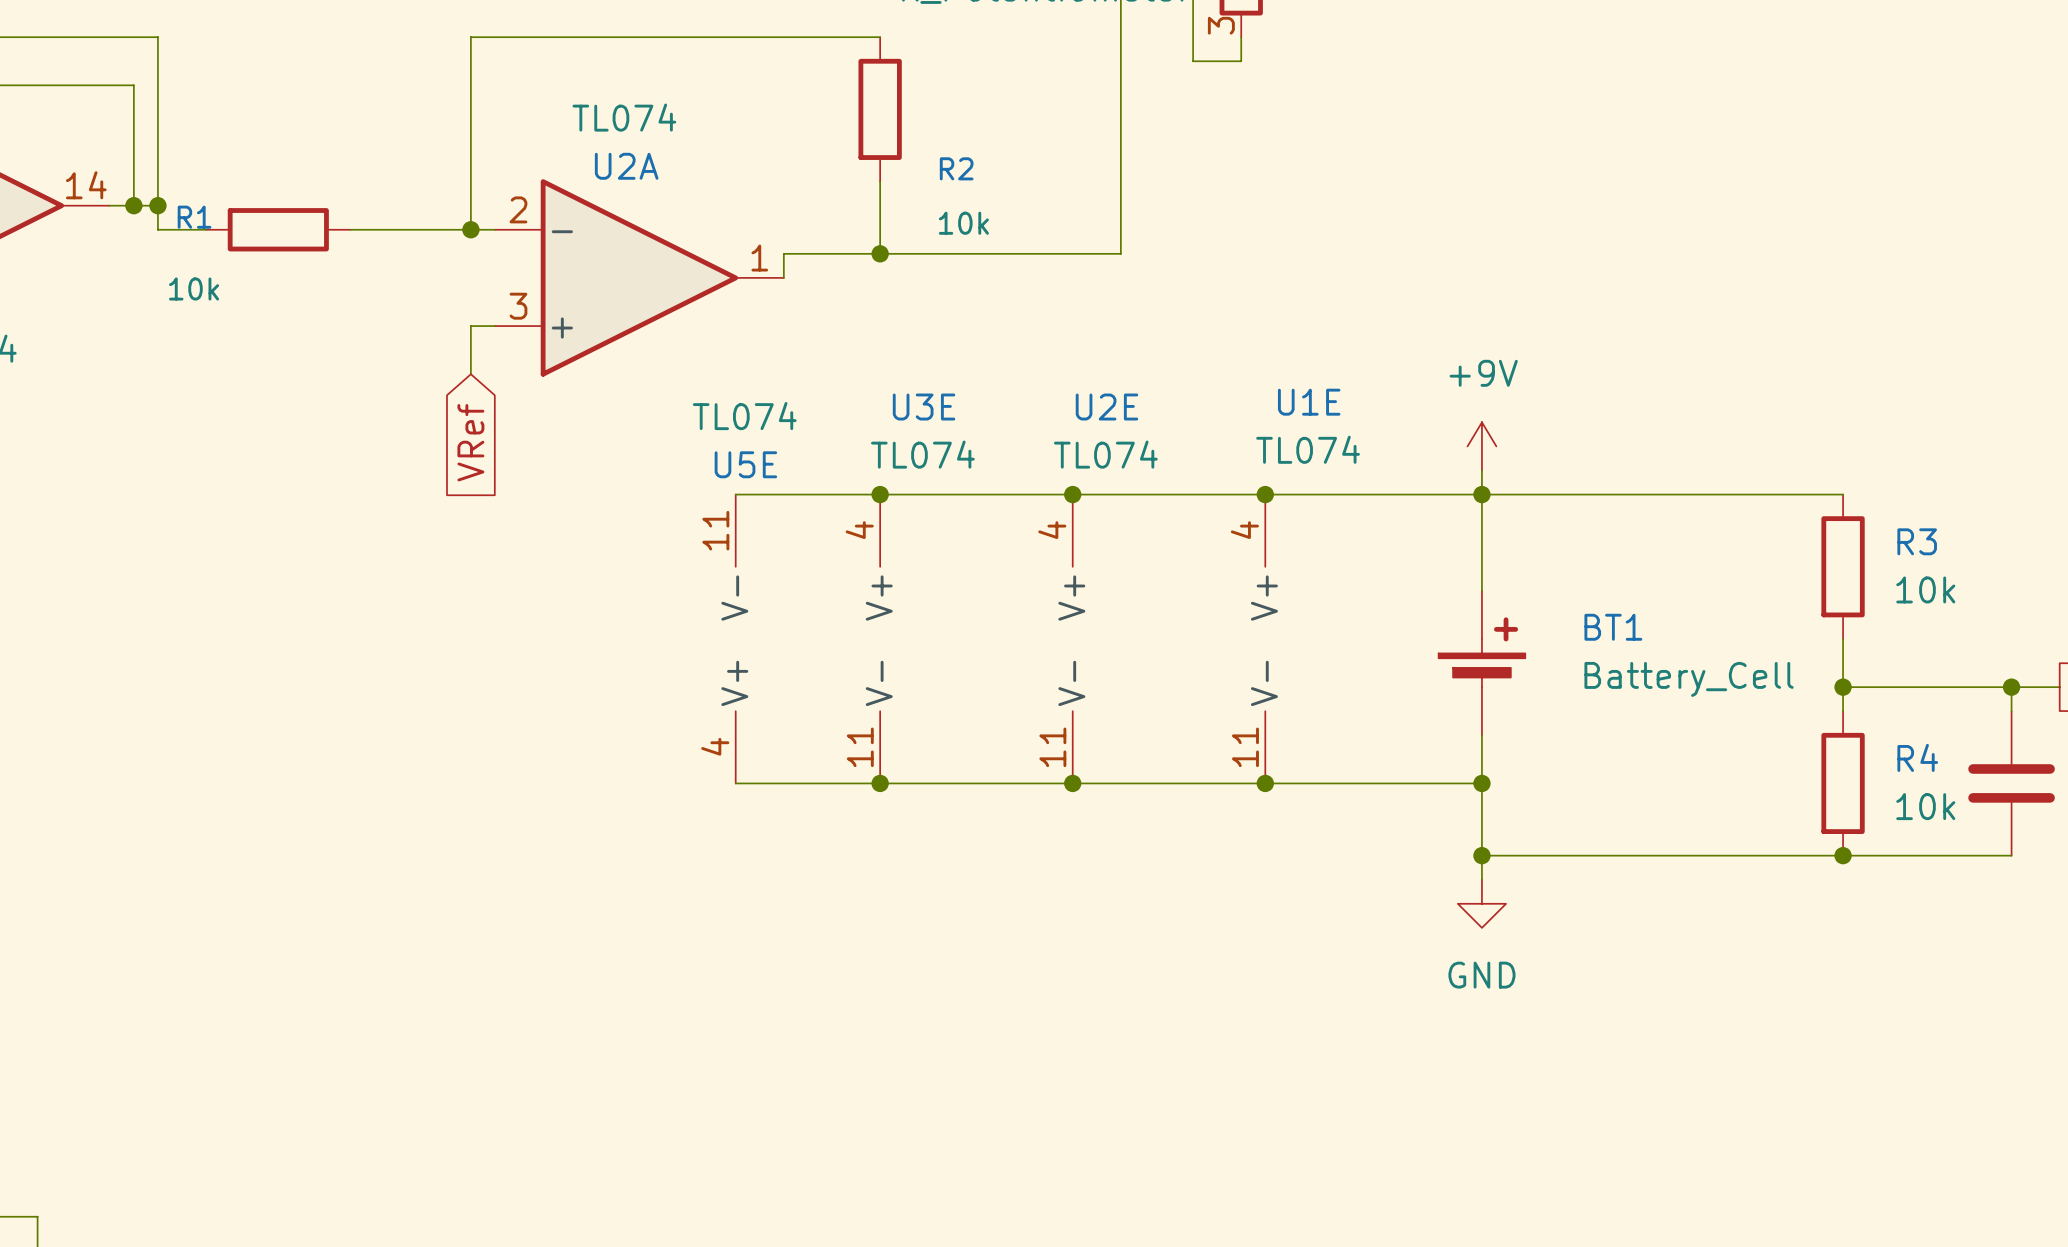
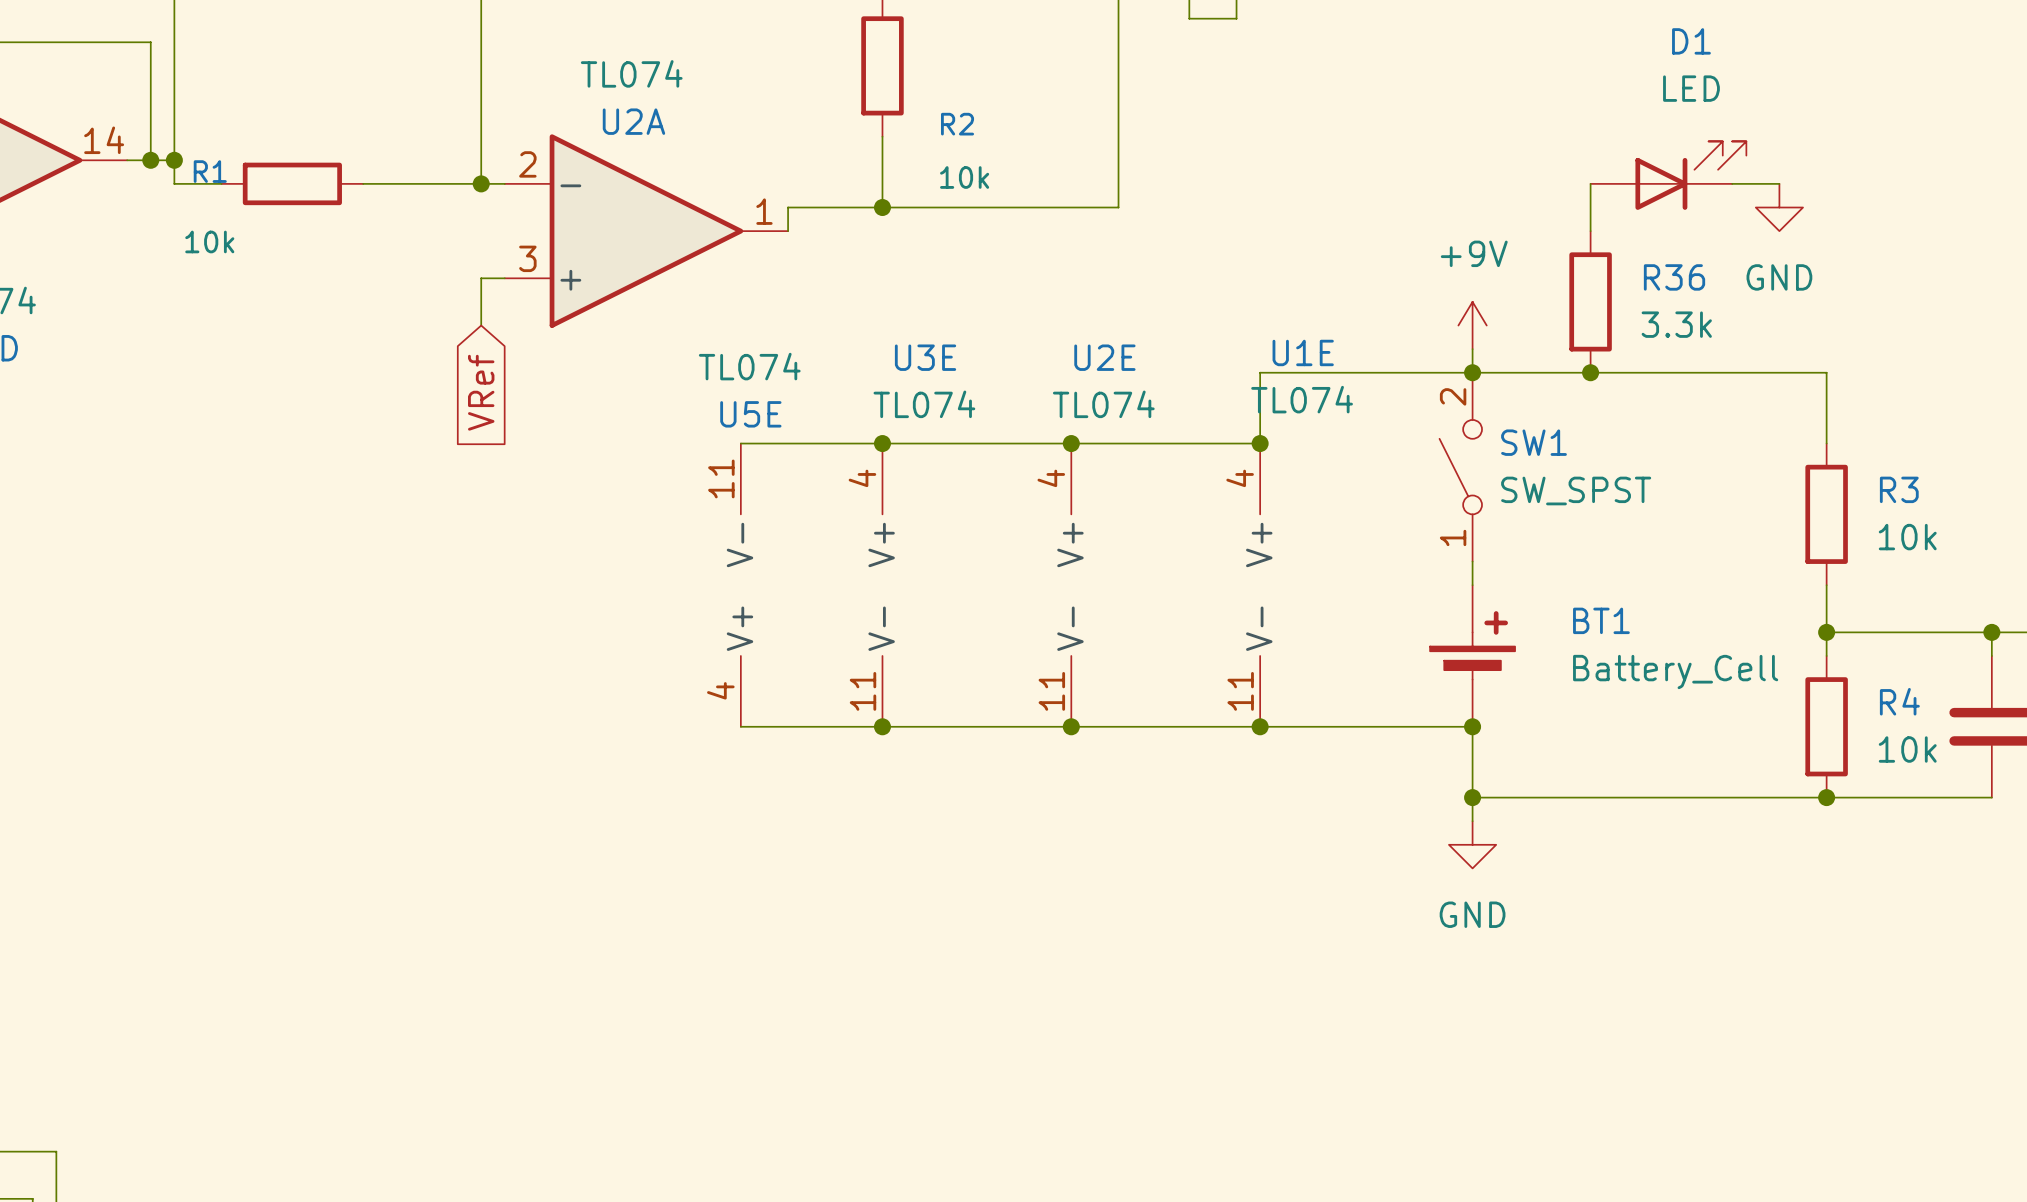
D1: none -> LED (1668, 175)
wire: none -> (1590, 183) (1590, 231)
wire: none -> (1732, 183) (1779, 183)
power symbol: none -> GND (1779, 207)
R36: none -> 3.3k (1590, 301)
wire: none -> (1472, 349) (1472, 372)
junction: none -> (1472, 372)
junction: none -> (1590, 372)
power symbol position: +9V (1481, 446) -> +9V (1472, 325)
wire: (1481, 470) (1481, 590) -> none
wire: (1265, 494) (1843, 494) -> (1260, 443) (1260, 372) (1826, 372) (1826, 443)
junction: (1481, 494) -> none
SW1: none -> SW_SPST (1460, 467)
BT1 position: (1481, 663) -> (1472, 655)

